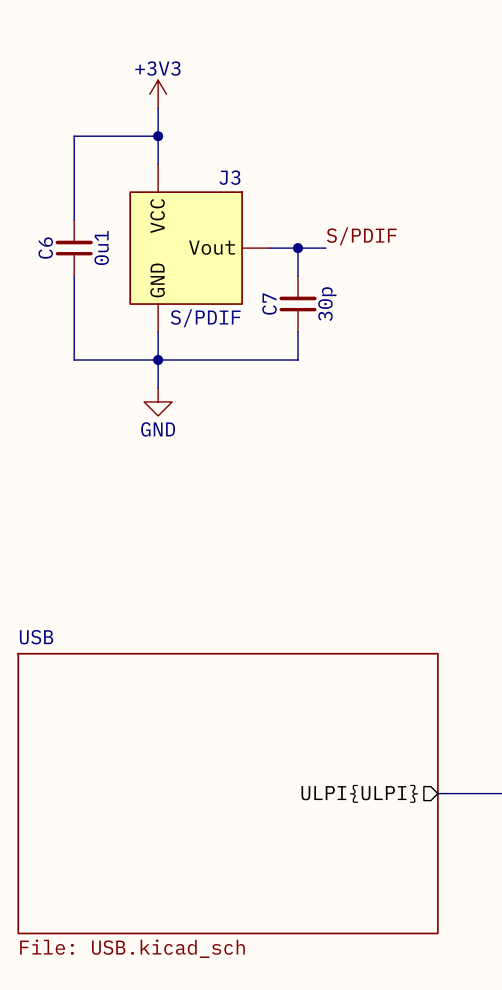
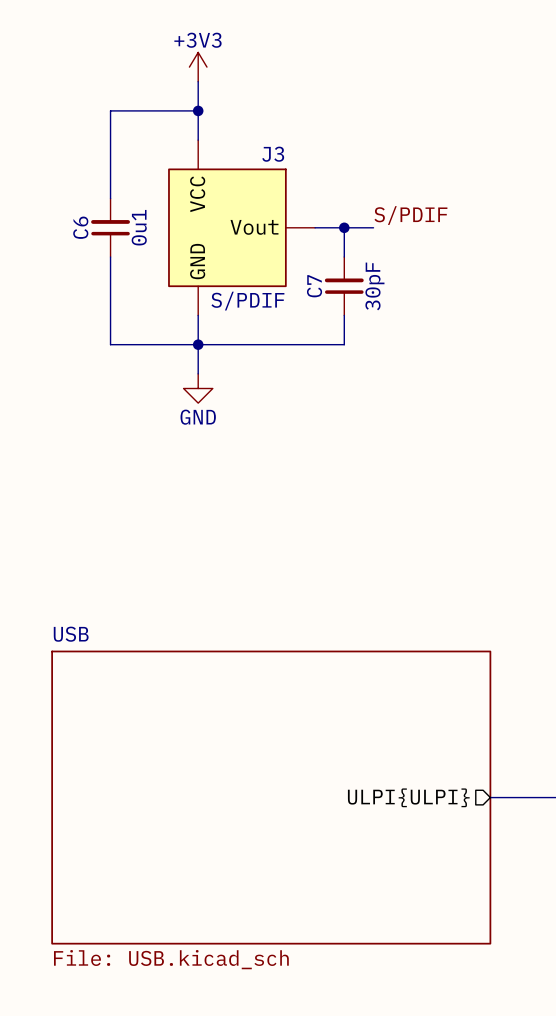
C7 value: 30p (327, 304) -> 30pF (374, 286)

